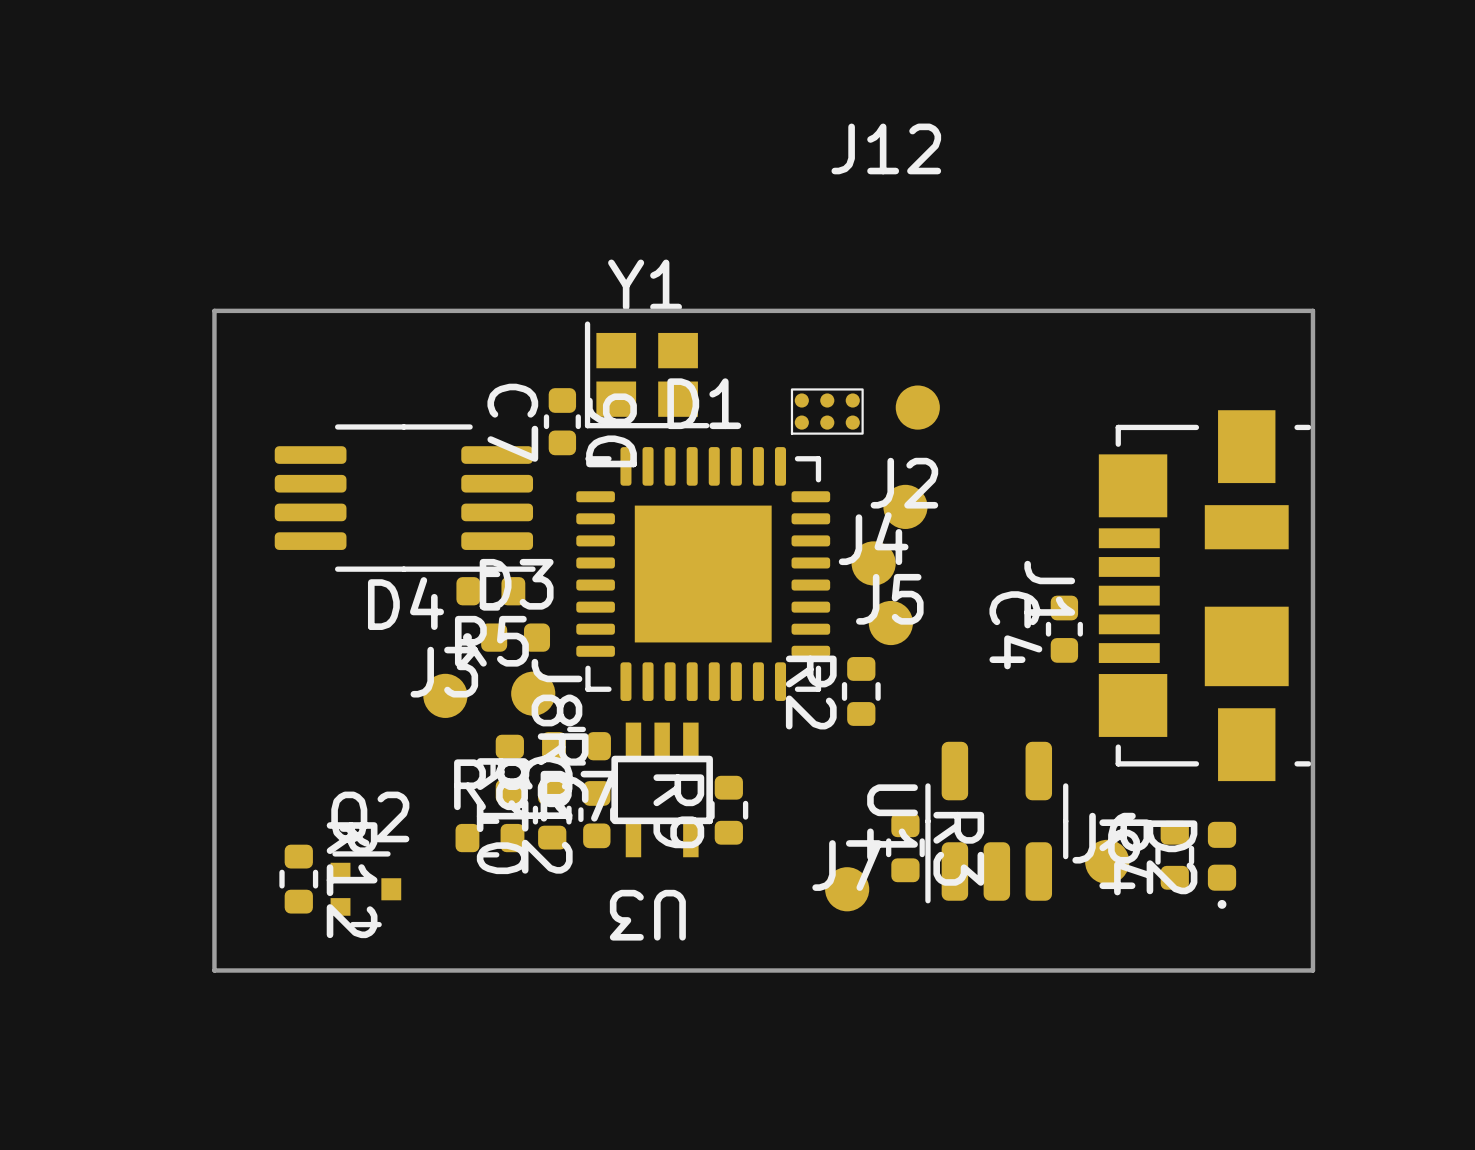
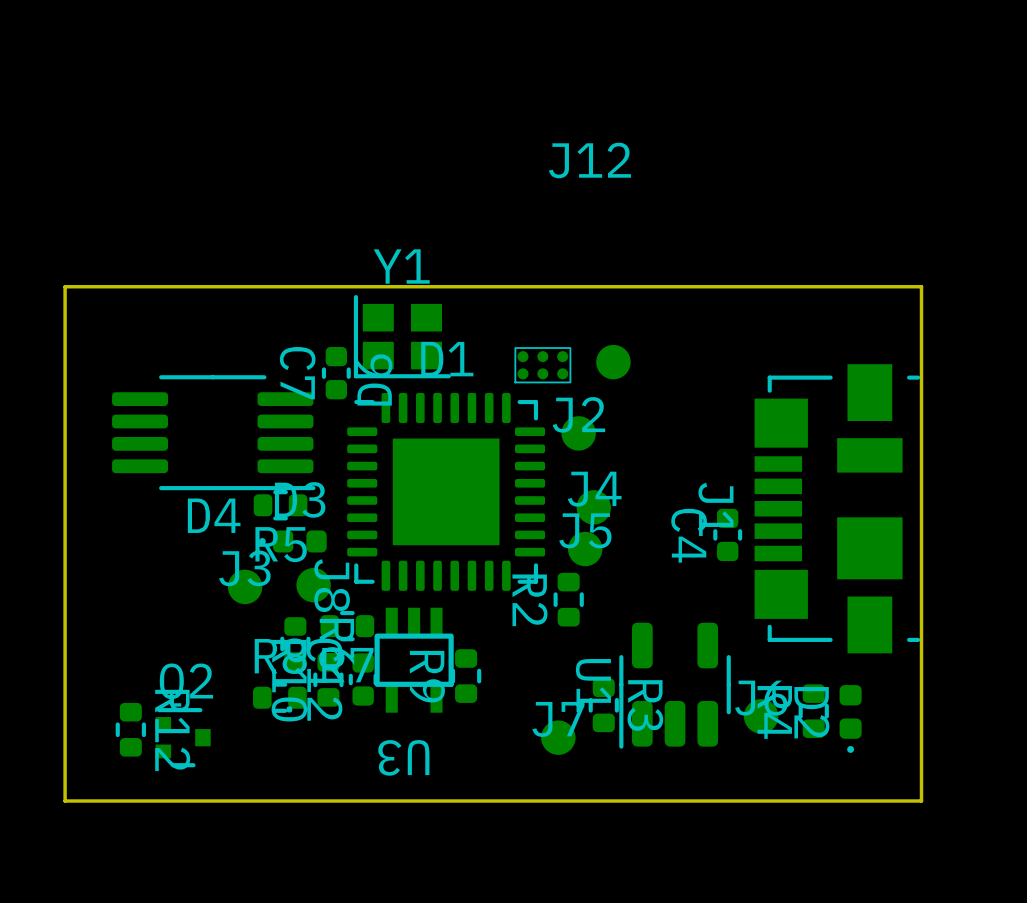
J2 position: (905, 506) -> (578, 433)
J4 position: (873, 563) -> (593, 507)
J5 position: (890, 623) -> (585, 549)
R2 position: (861, 691) -> (568, 599)

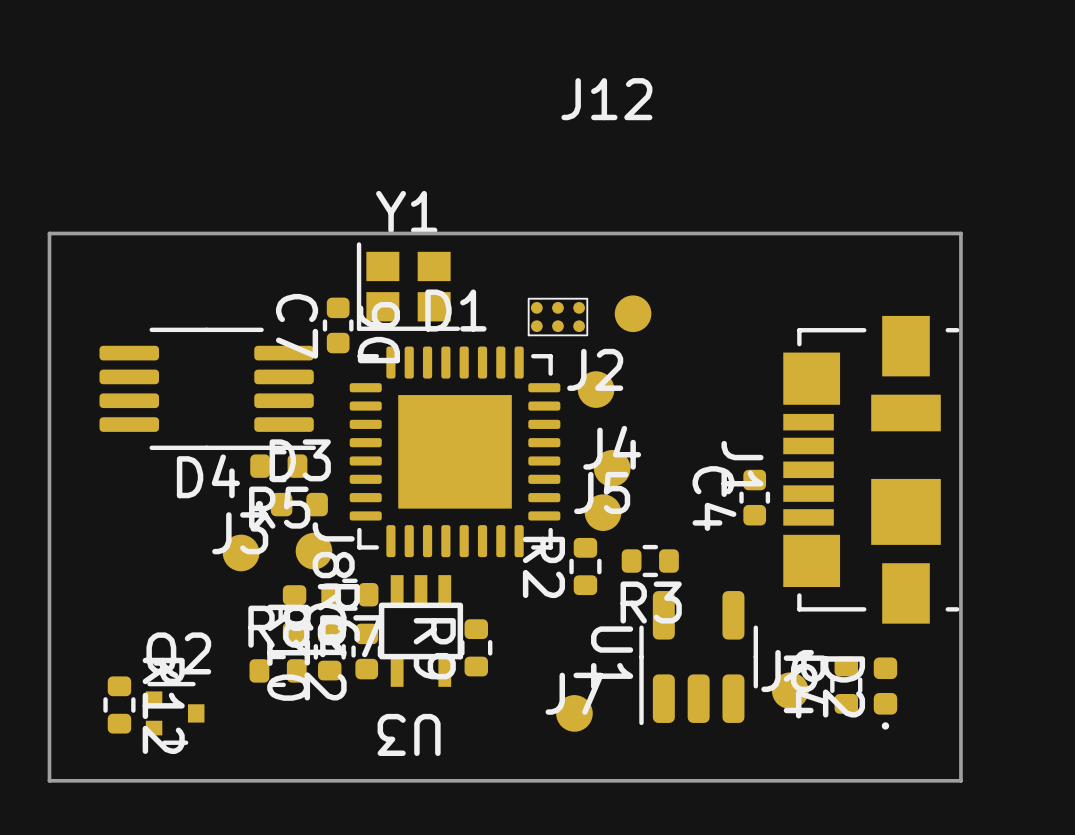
R3 rotation: 0° (603, 705) -> 90° clockwise (650, 561)
R3 position: (603, 705) -> (650, 561)

